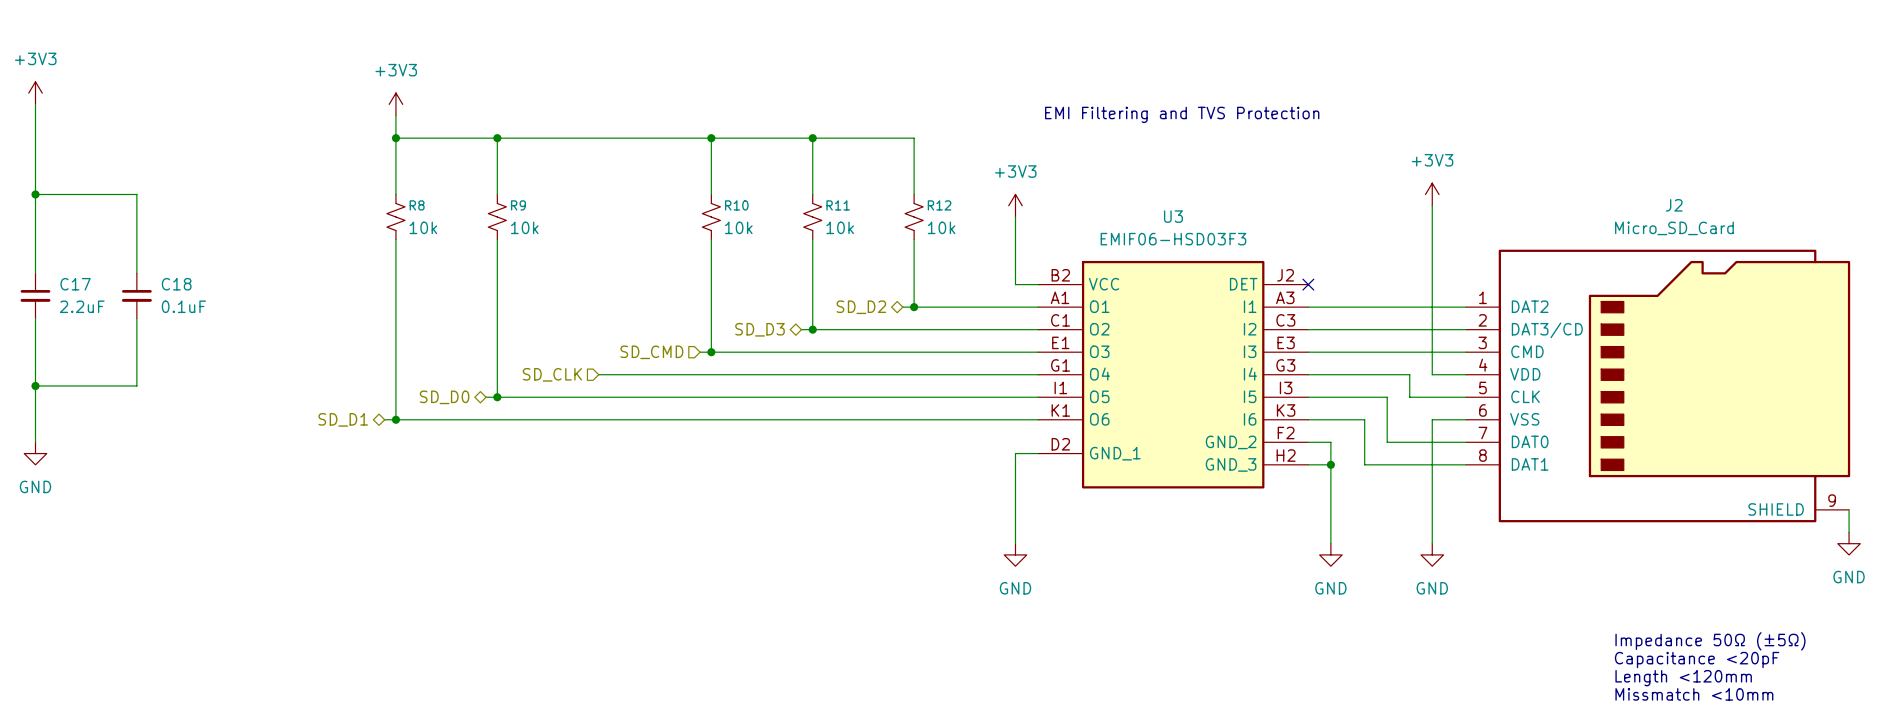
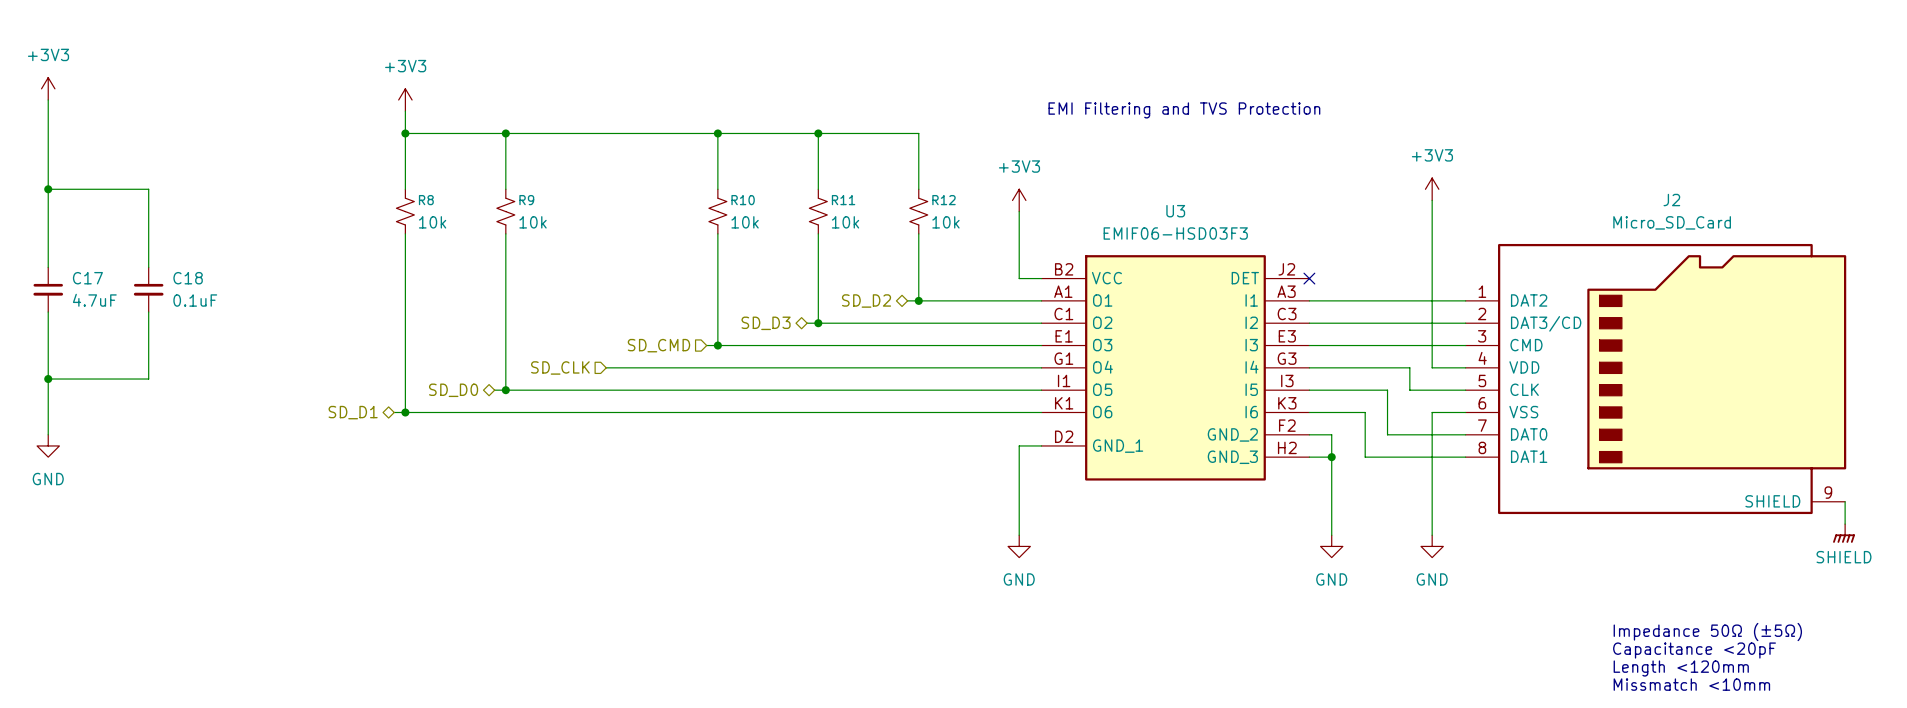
C17 value: 2.2uF (82, 306) -> 4.7uF (94, 300)
power symbol: GND (1849, 543) -> SHIELD (1843, 533)

